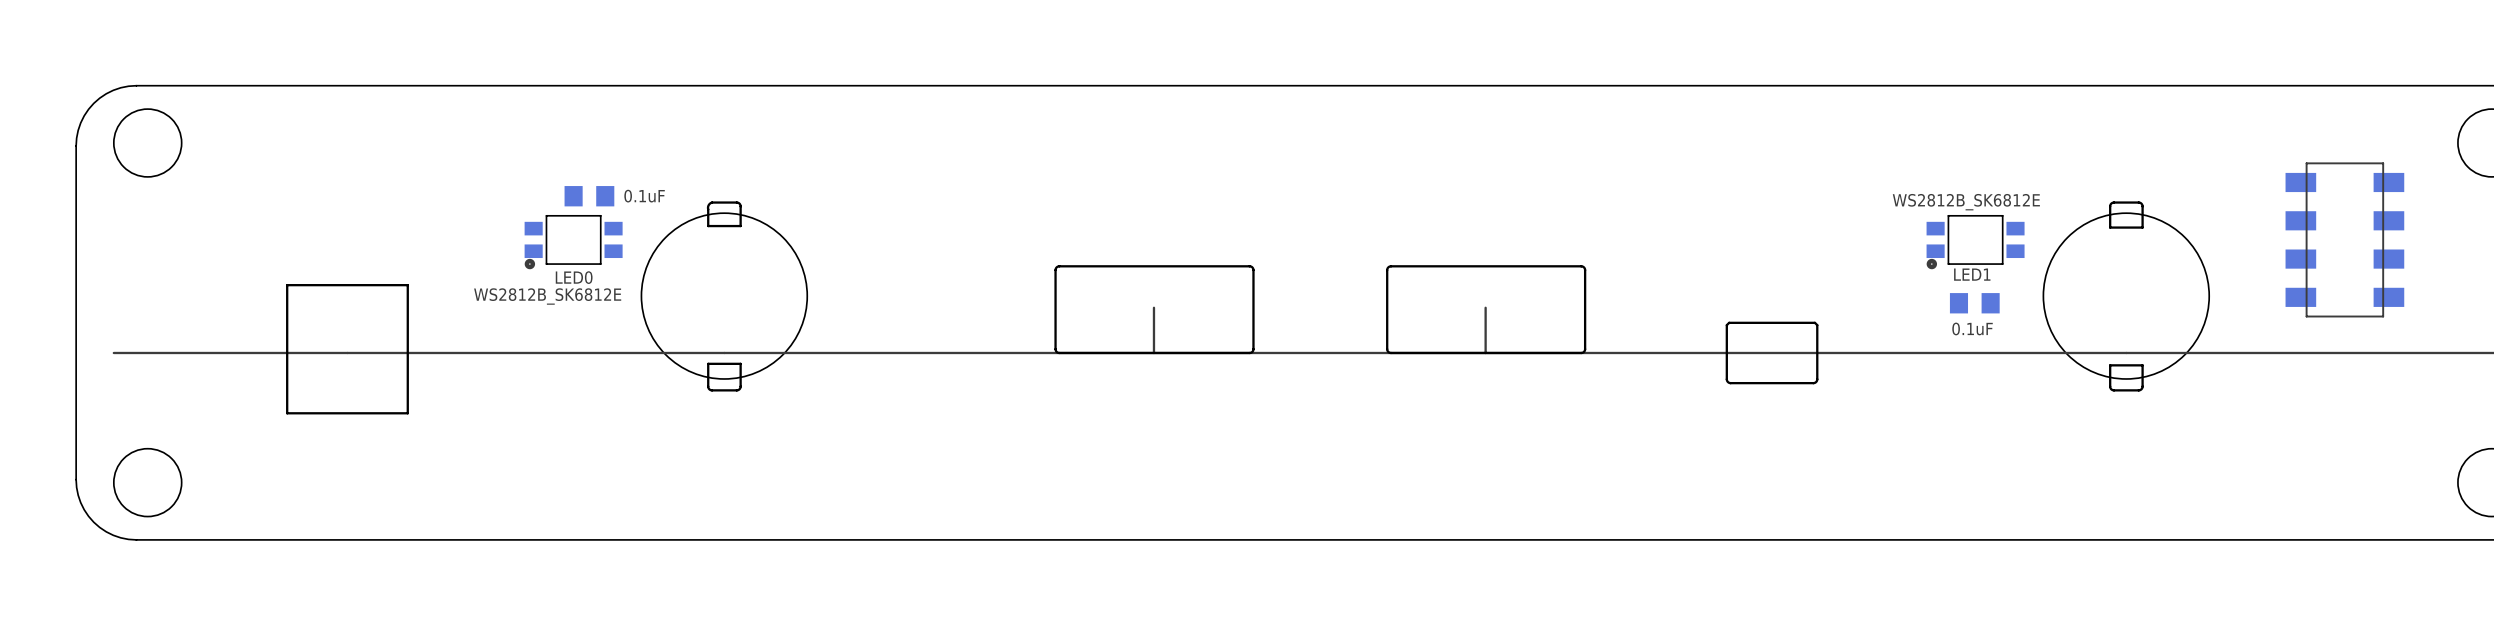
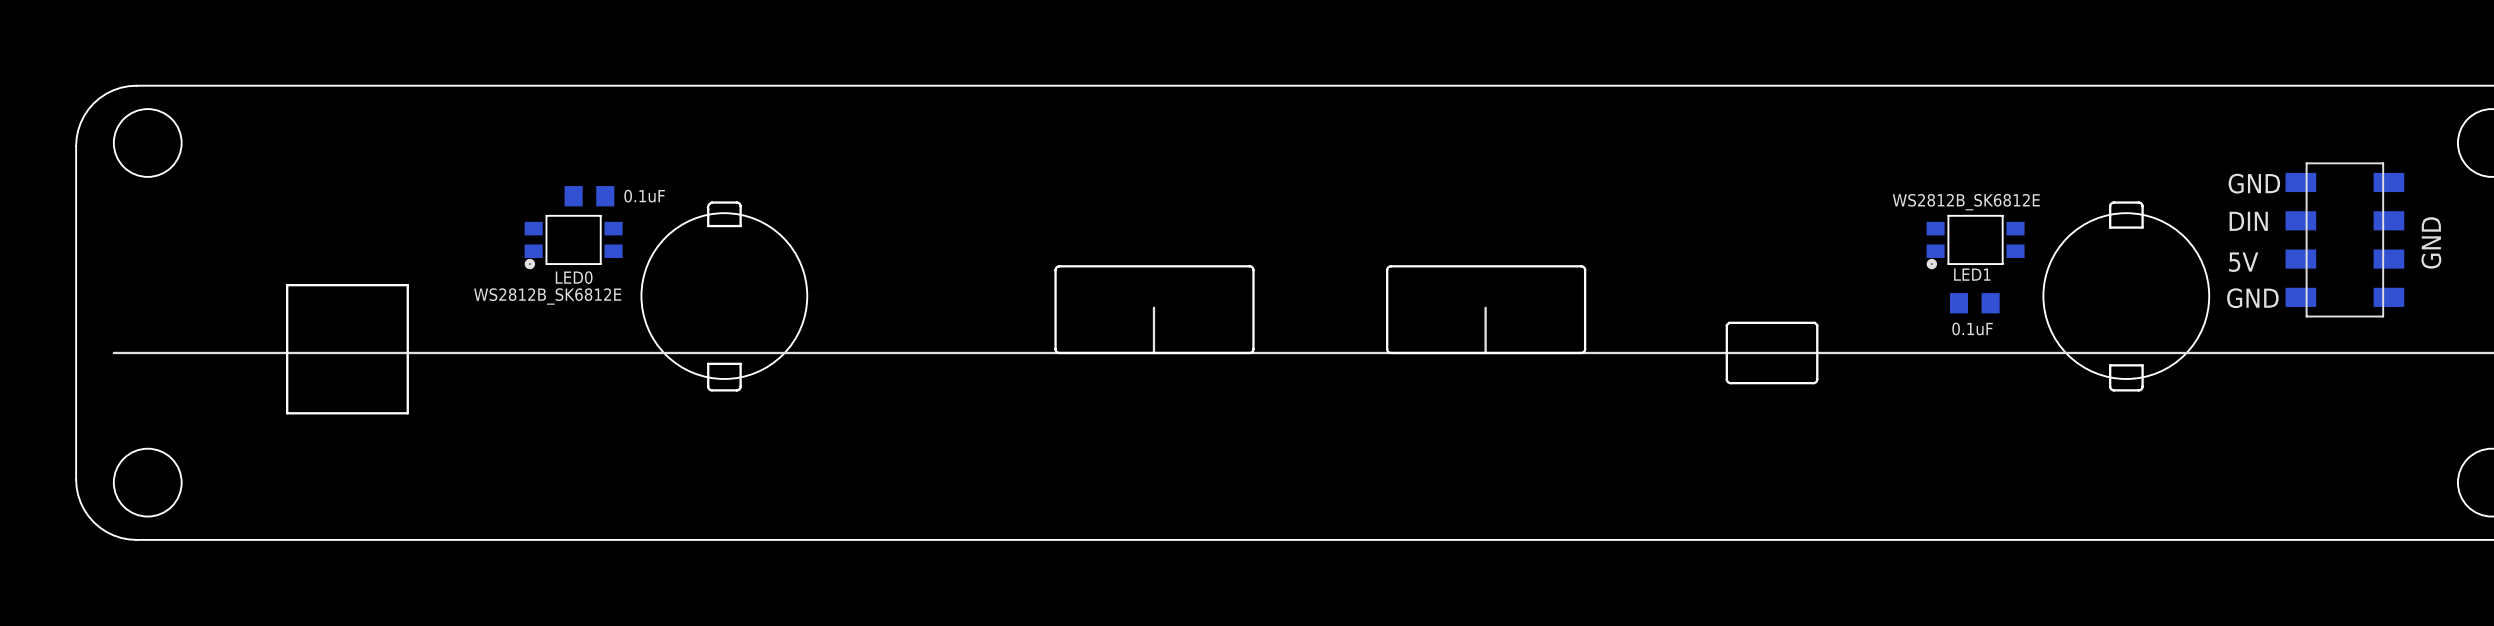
text: none -> GND (2254, 183)
text: none -> DIN (2248, 221)
text: none -> GND (2431, 242)
text: none -> 5V (2243, 262)
text: none -> GND (2252, 298)

